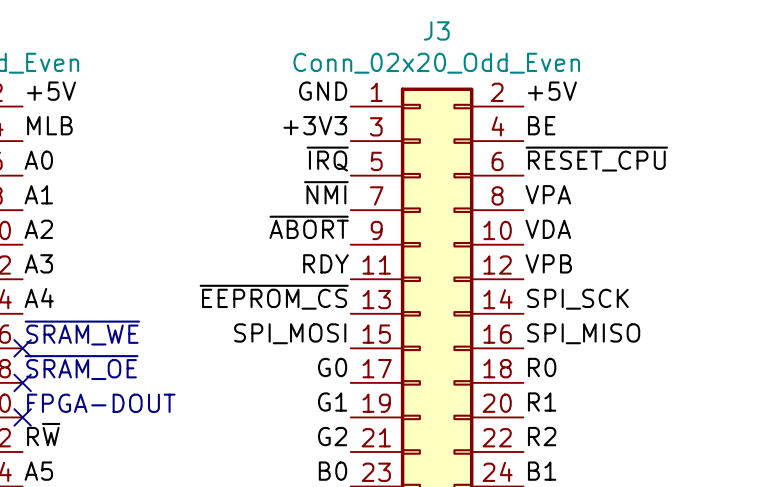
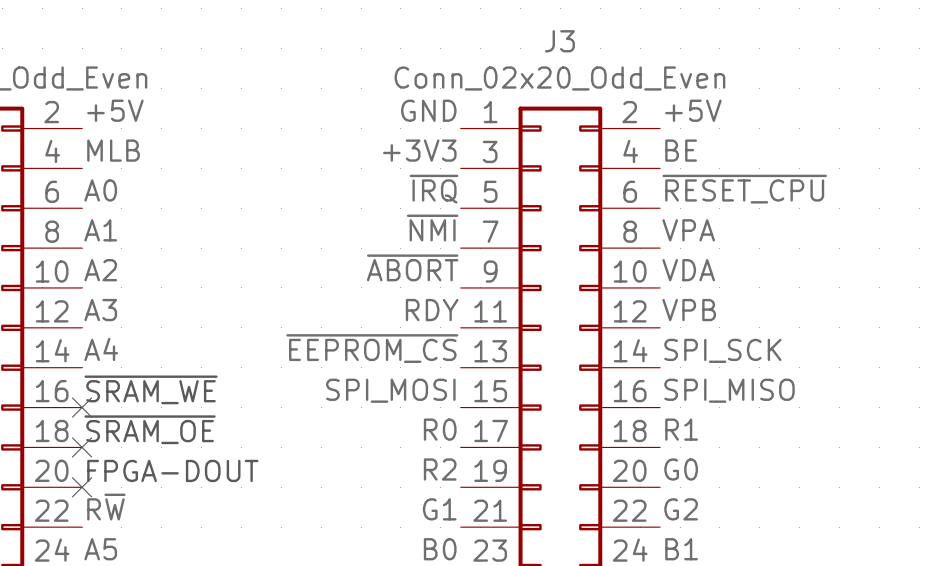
label: G0 (332, 367) -> R0 (440, 429)
label: R0 (542, 367) -> R1 (681, 429)
label: G1 (332, 402) -> R2 (440, 469)
label: R1 (542, 402) -> G0 (681, 469)
label: G2 (332, 436) -> G1 (439, 509)
label: R2 (542, 436) -> G2 (681, 509)

